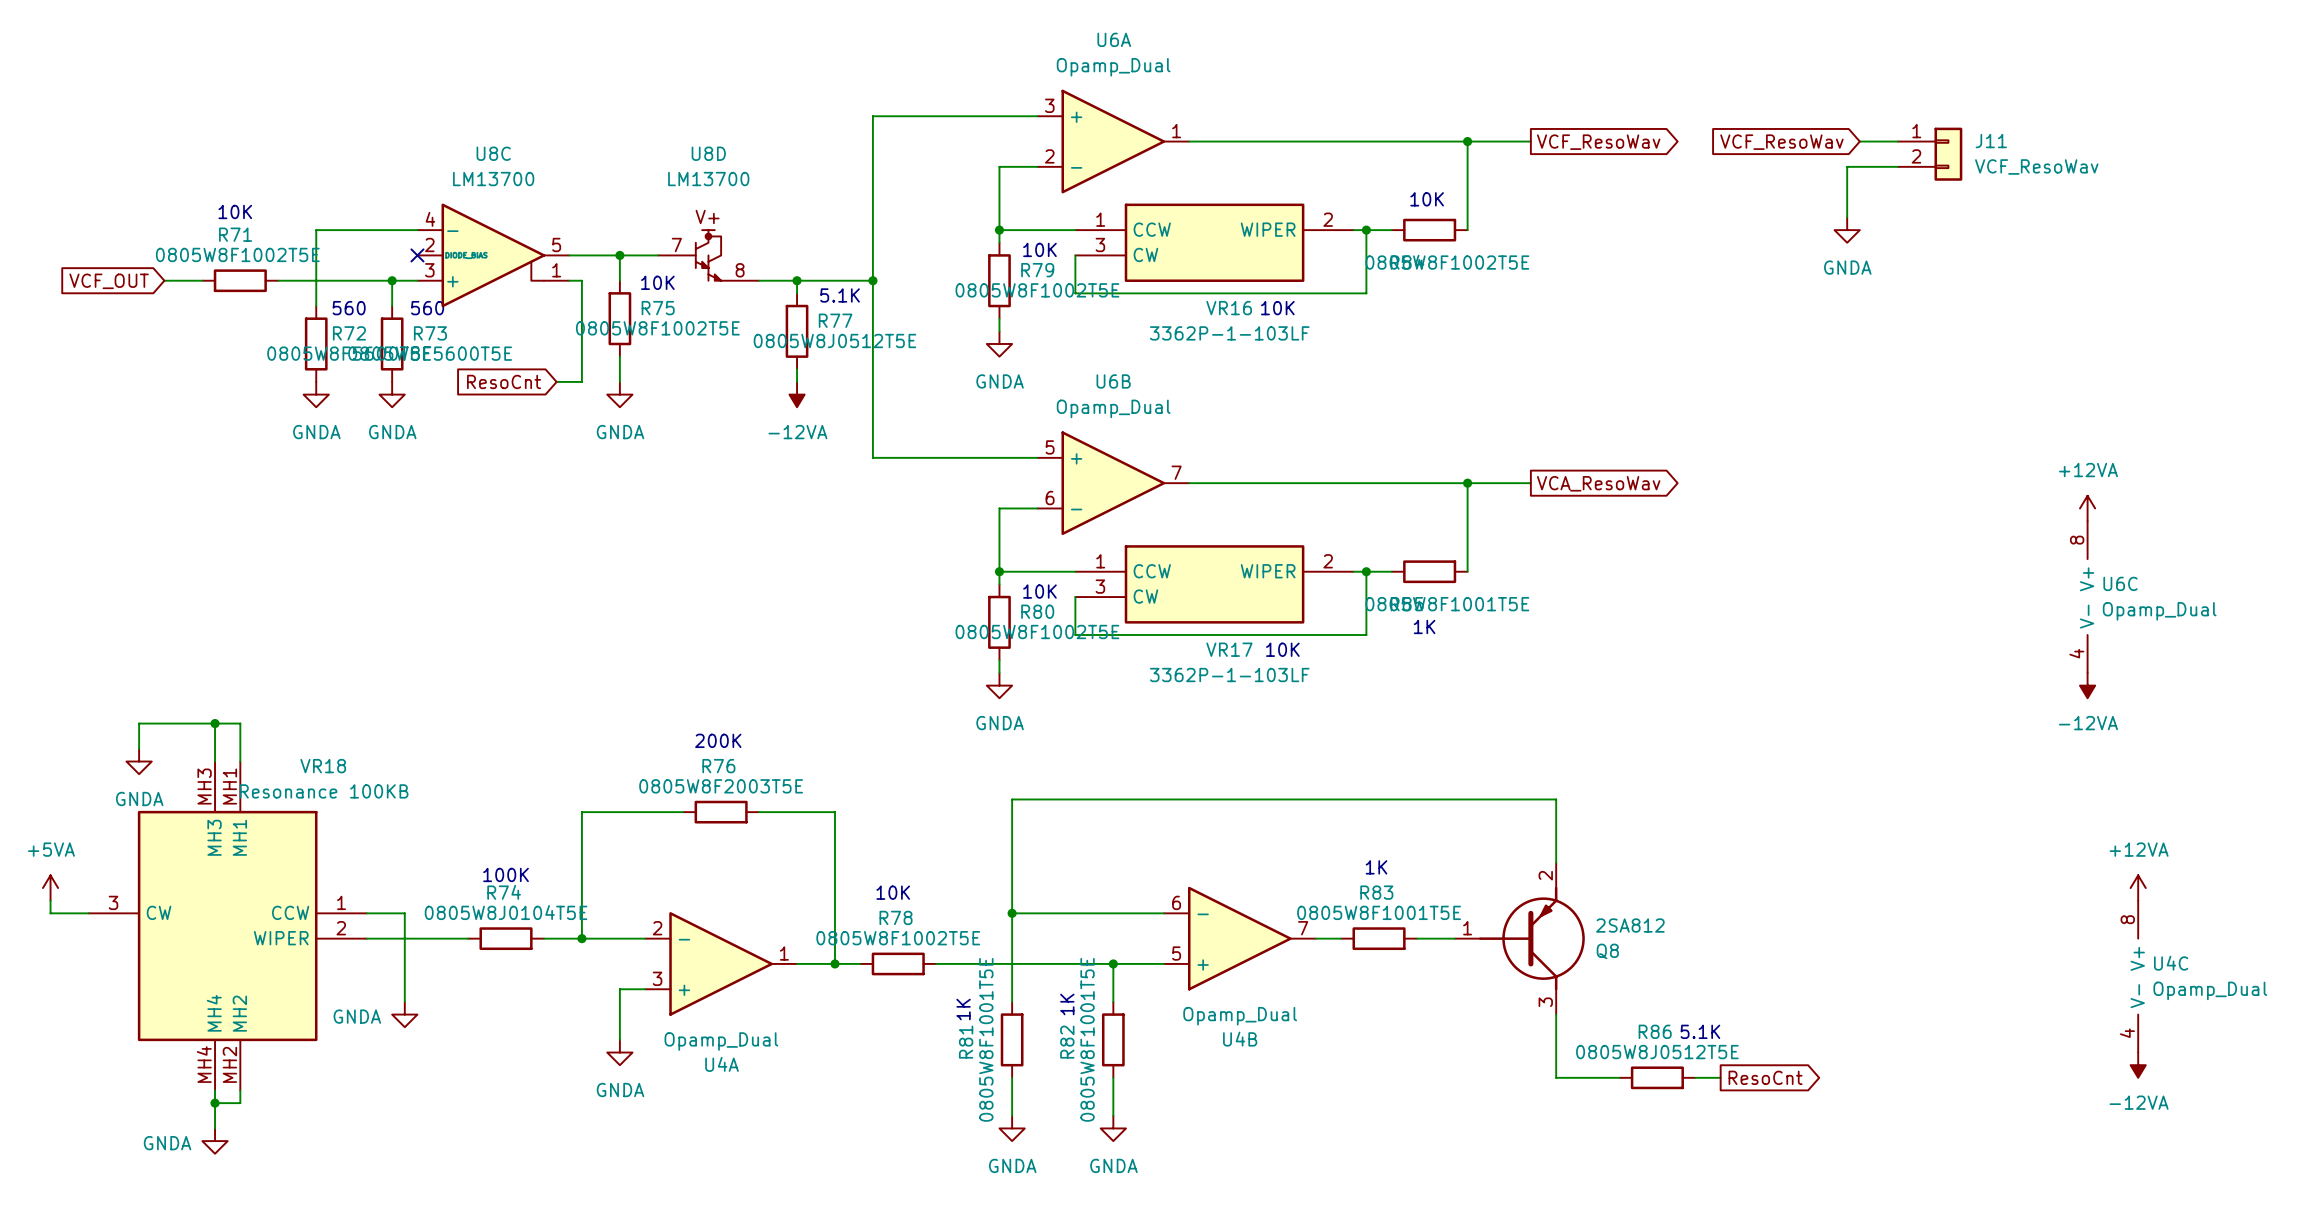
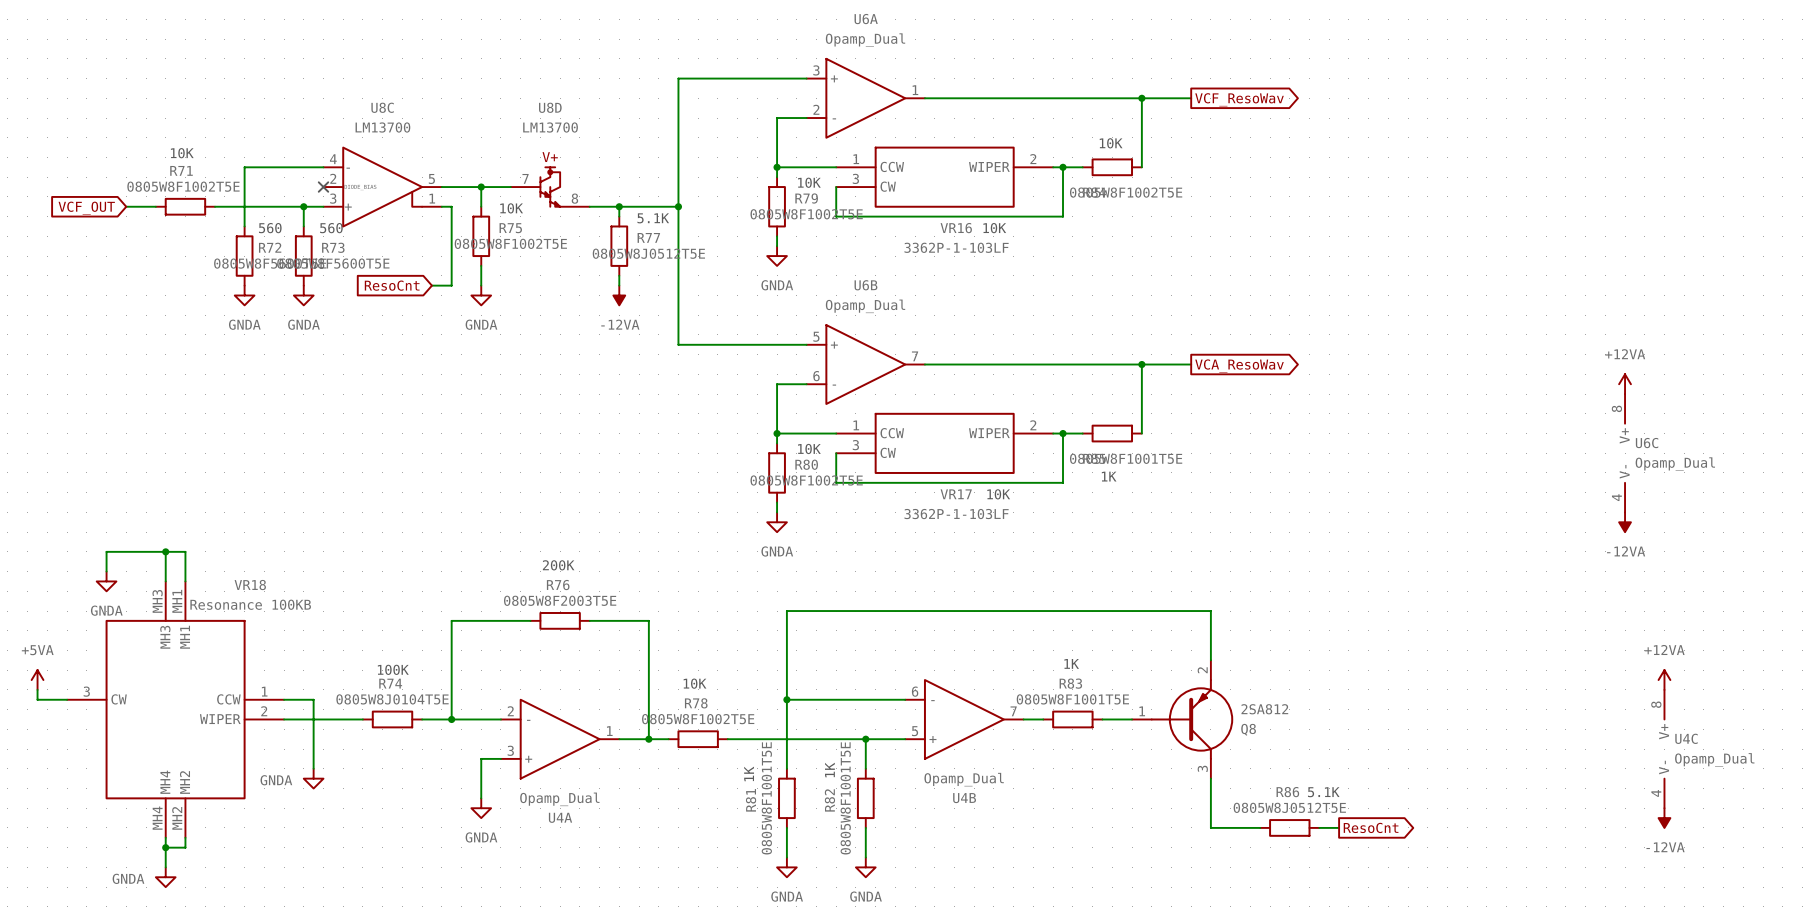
wire: (1859, 141) (1897, 141) -> none
global label: VCF_ResoWav (1781, 142) -> none
J11: VCF_ResoWav (1930, 154) -> none
wire: (1897, 166) (1847, 166) (1847, 217) -> none
power symbol: GNDA (1847, 230) -> none

